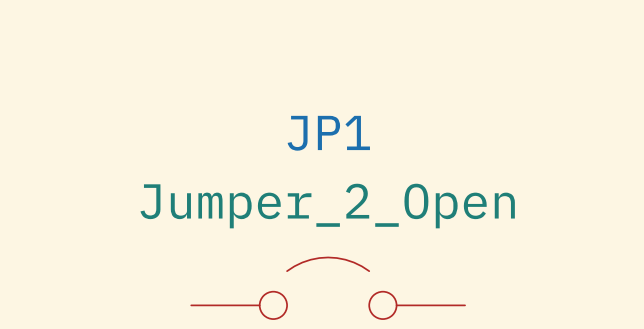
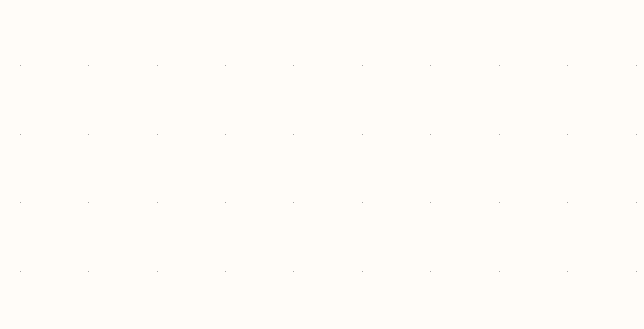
JP1: Jumper_2_Open (328, 288) -> none

